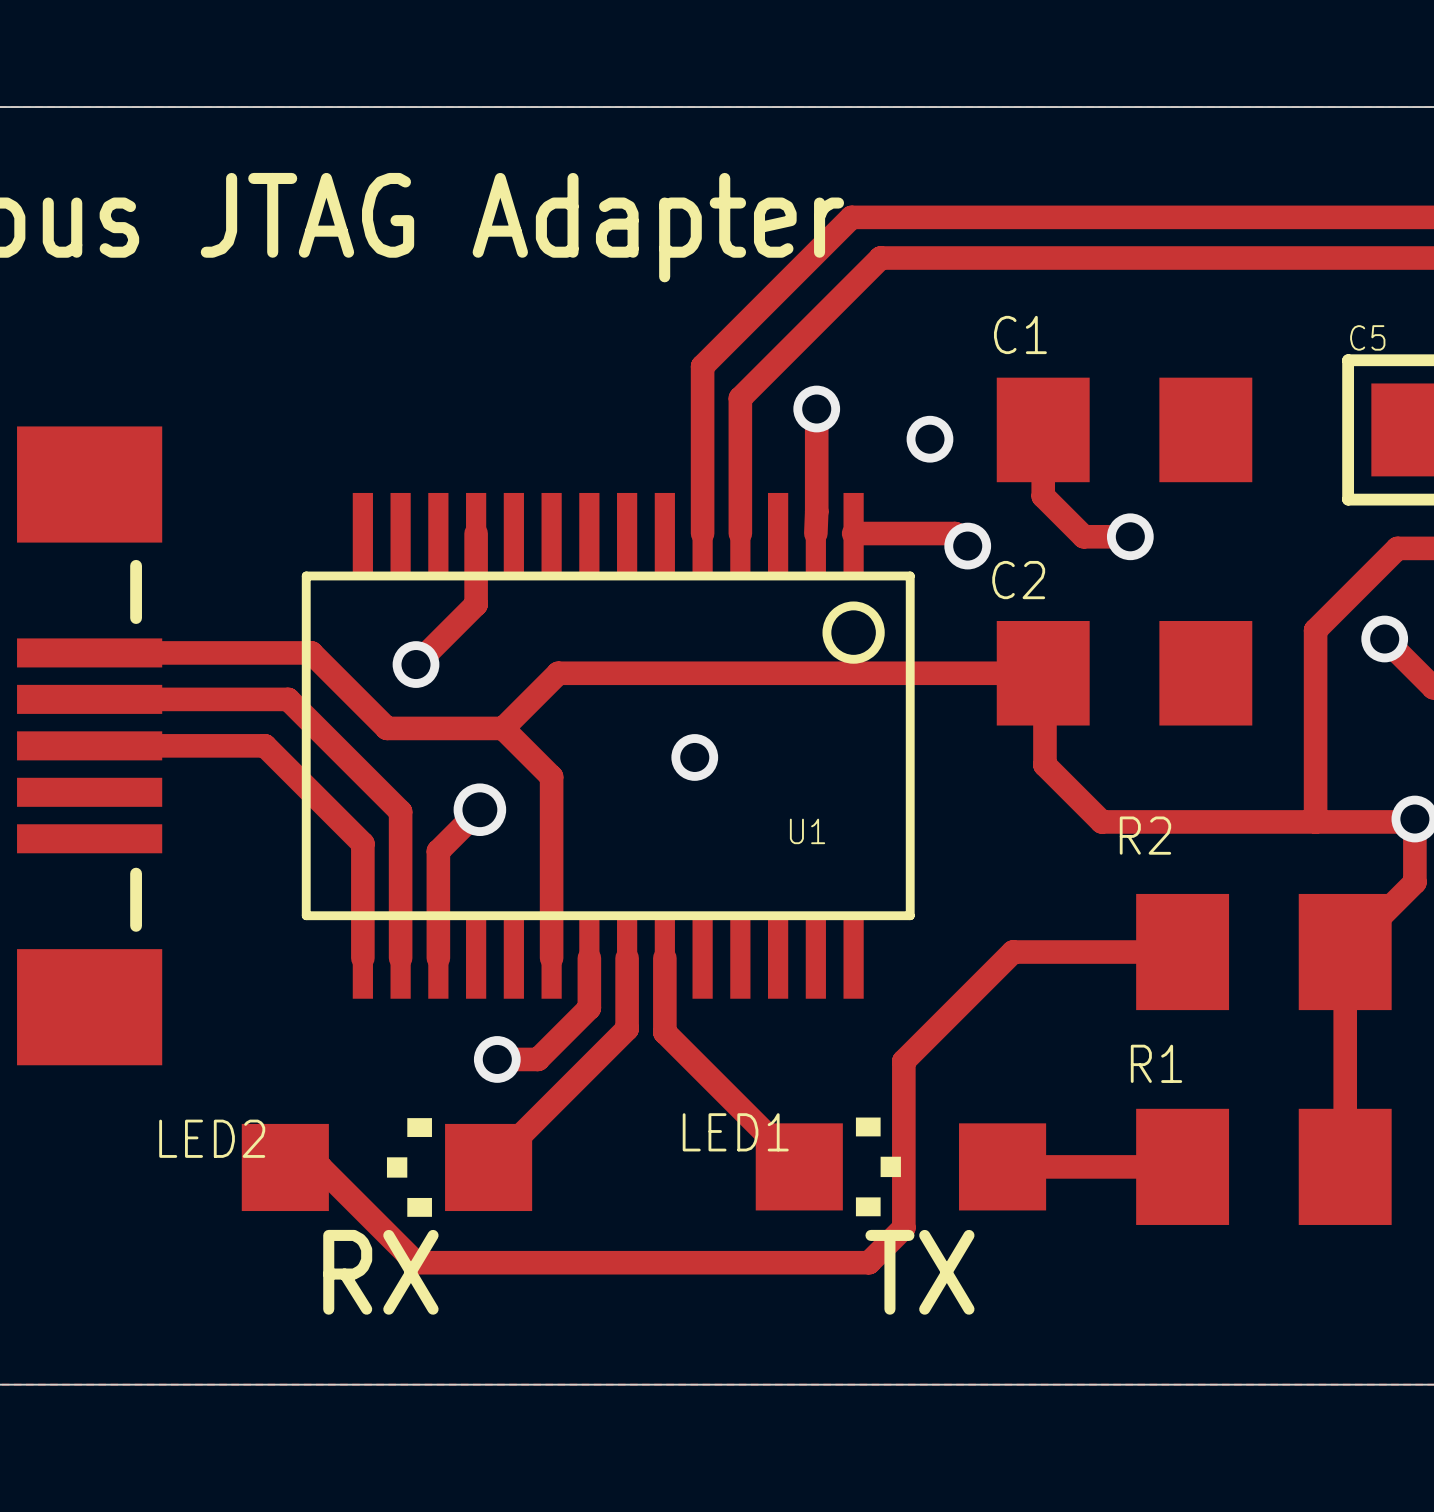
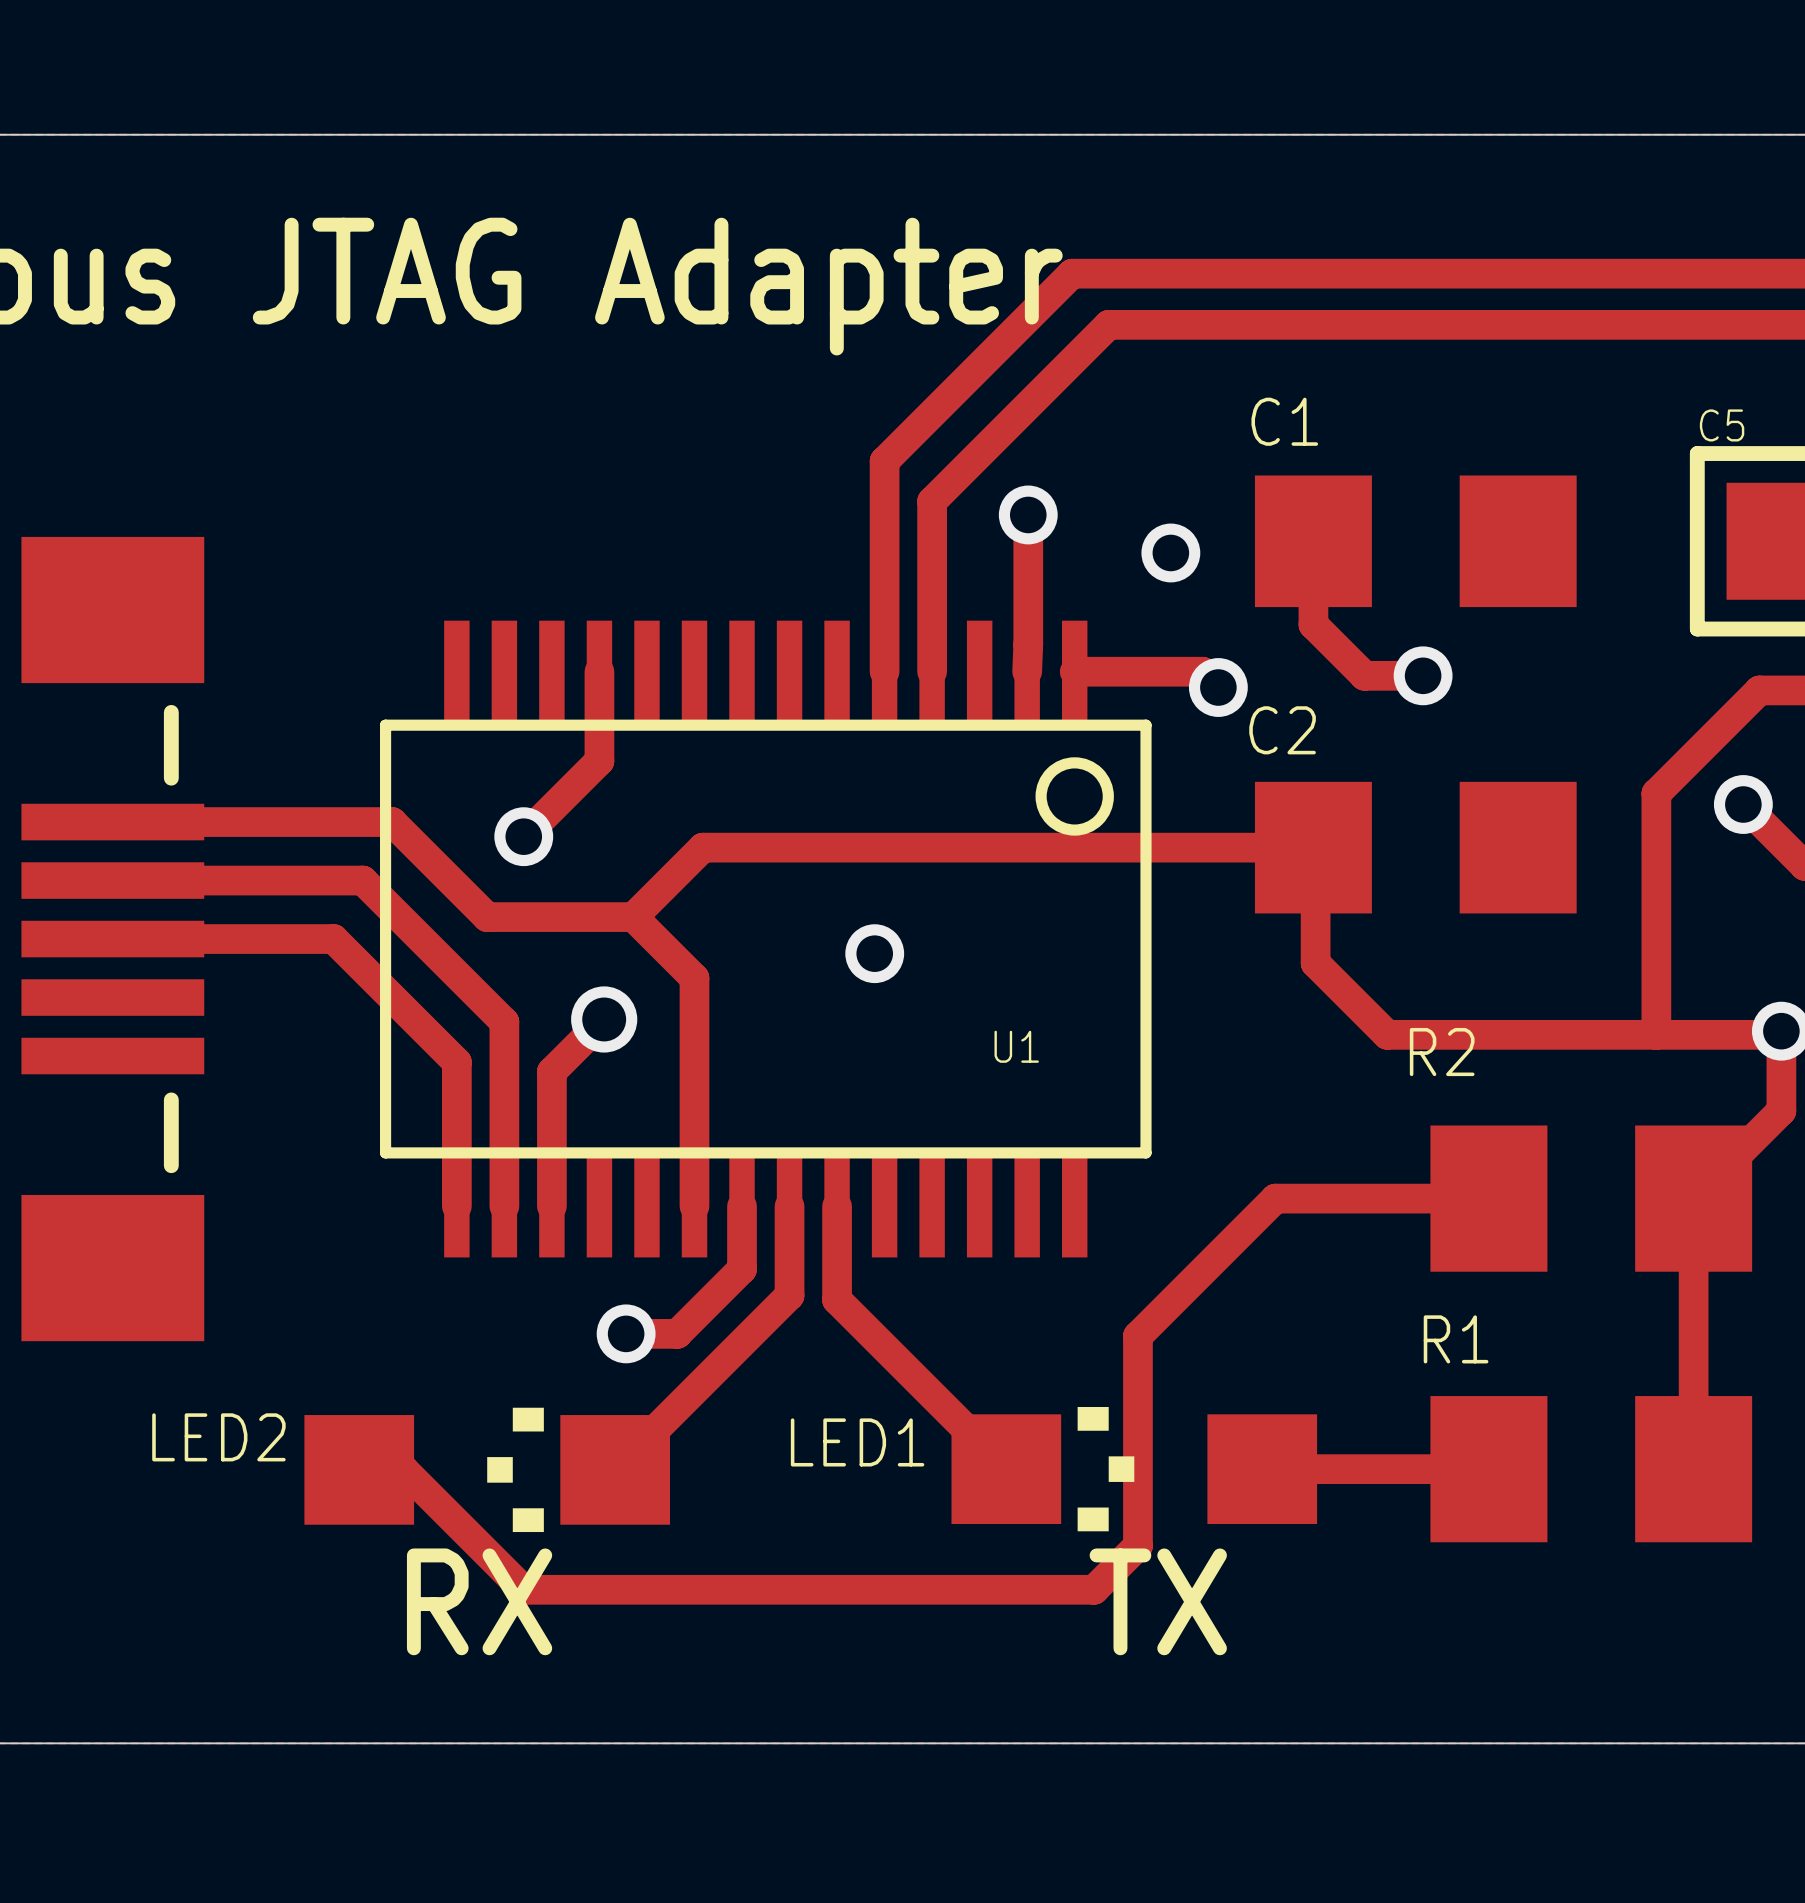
LED1 name position: LED1 (735, 1132) -> LED1 (857, 1442)
LED2 name position: LED2 (212, 1138) -> LED2 (218, 1437)

